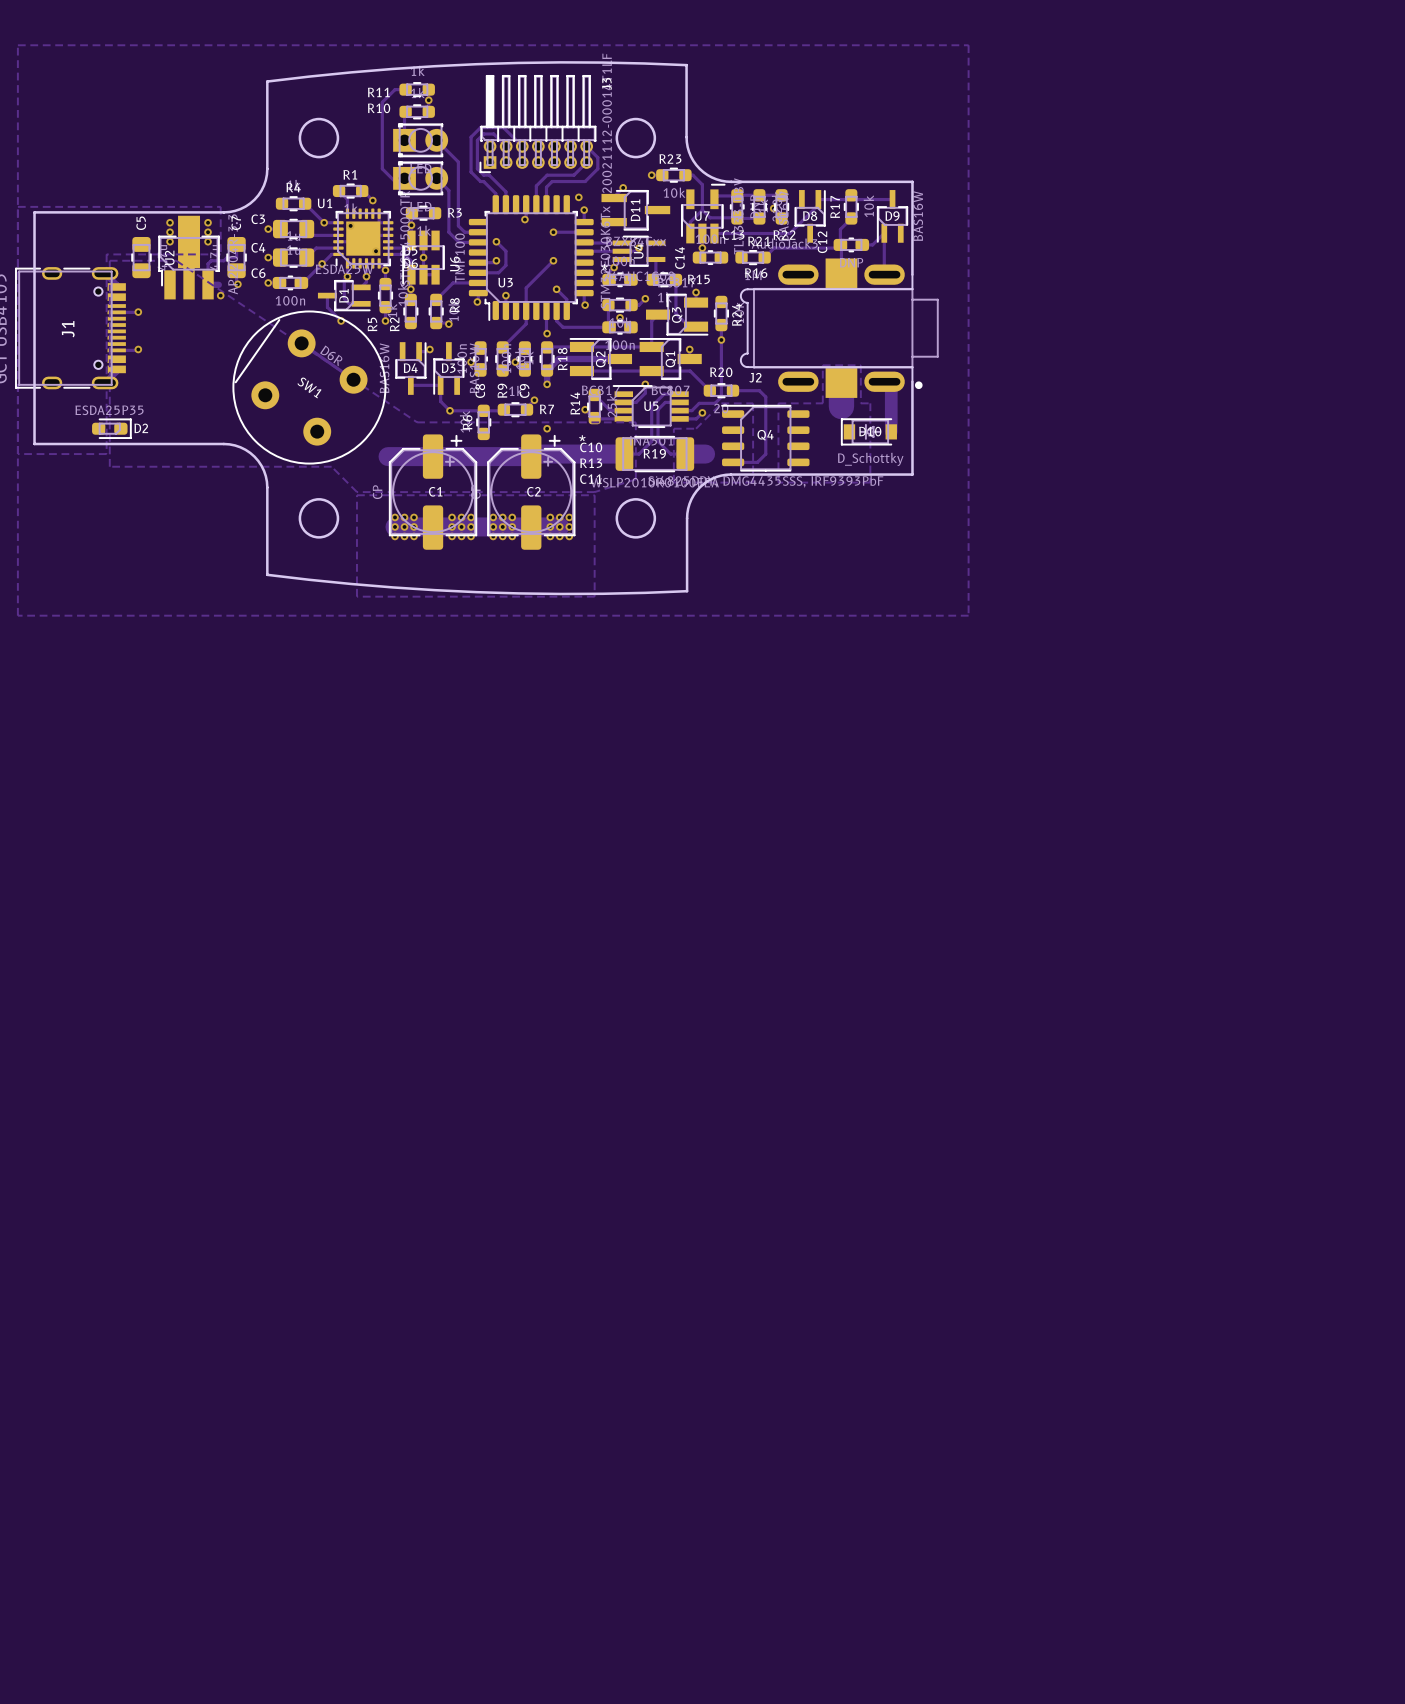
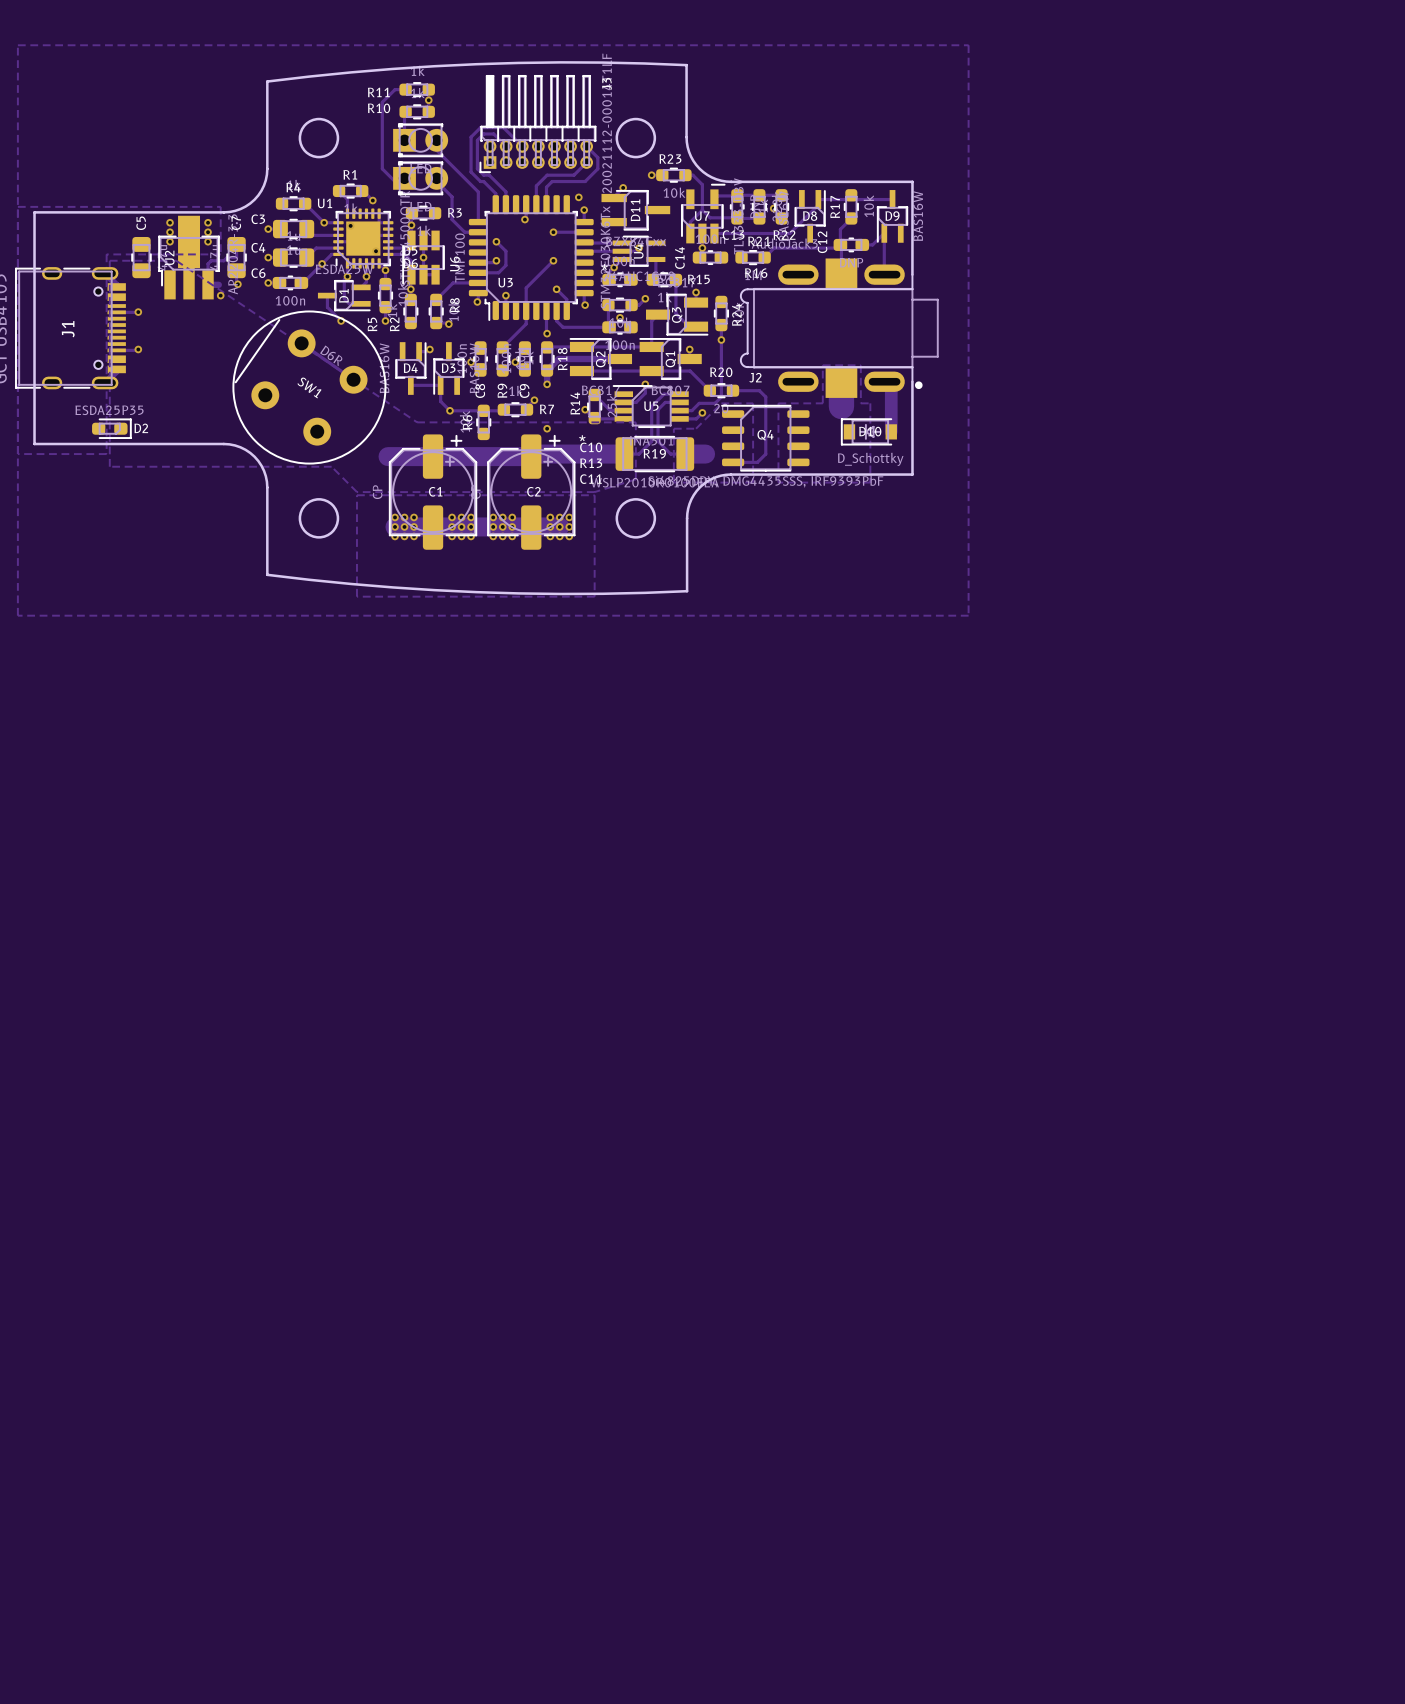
track: (436, 140) (458, 162) (458, 225) -> (436, 181) (452, 196) (452, 219) (458, 225)
track: none -> (436, 143) (436, 150) (478, 191) (478, 222)
track: (436, 178) (448, 190) (448, 232) (459, 242) (478, 242) -> none

